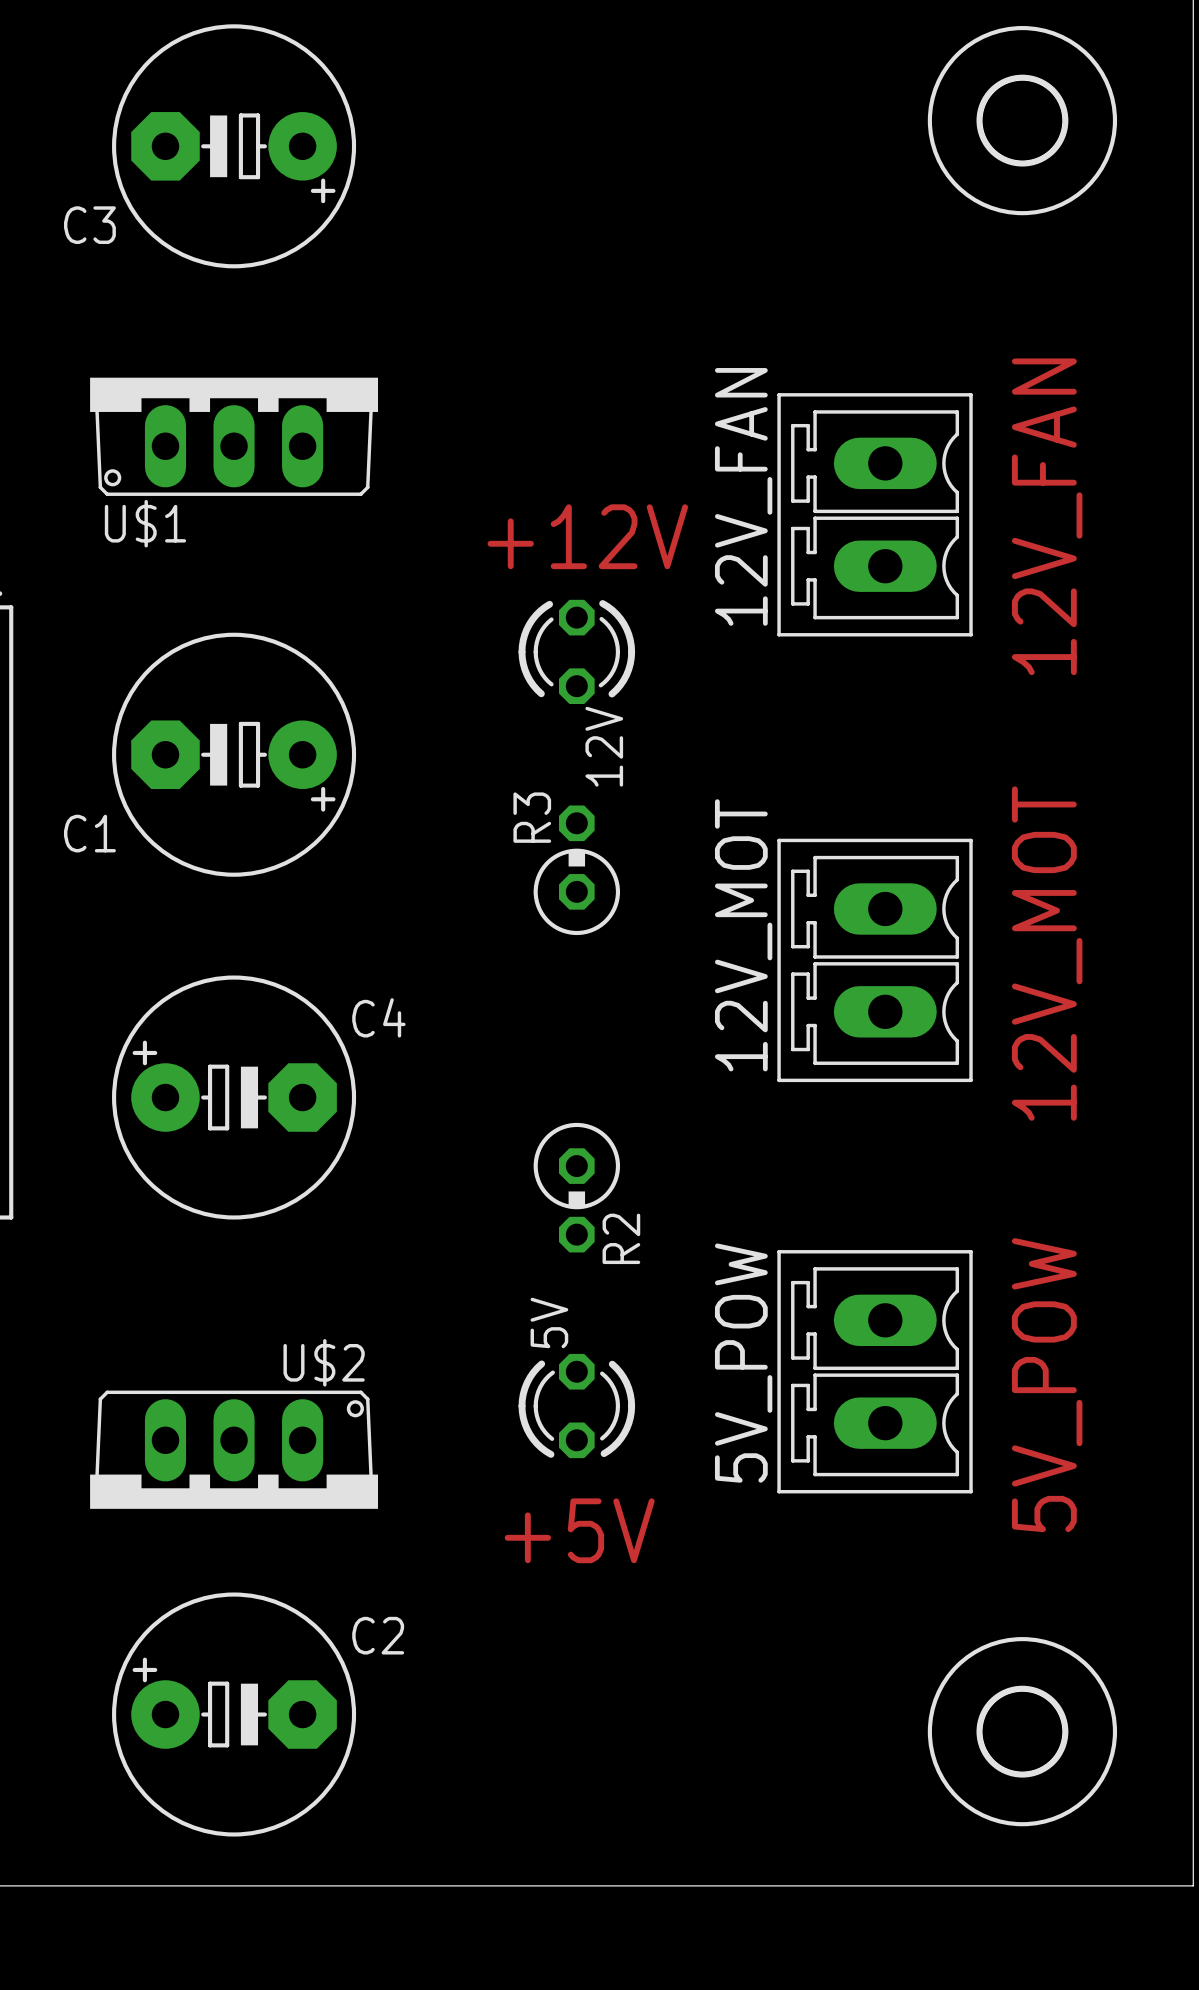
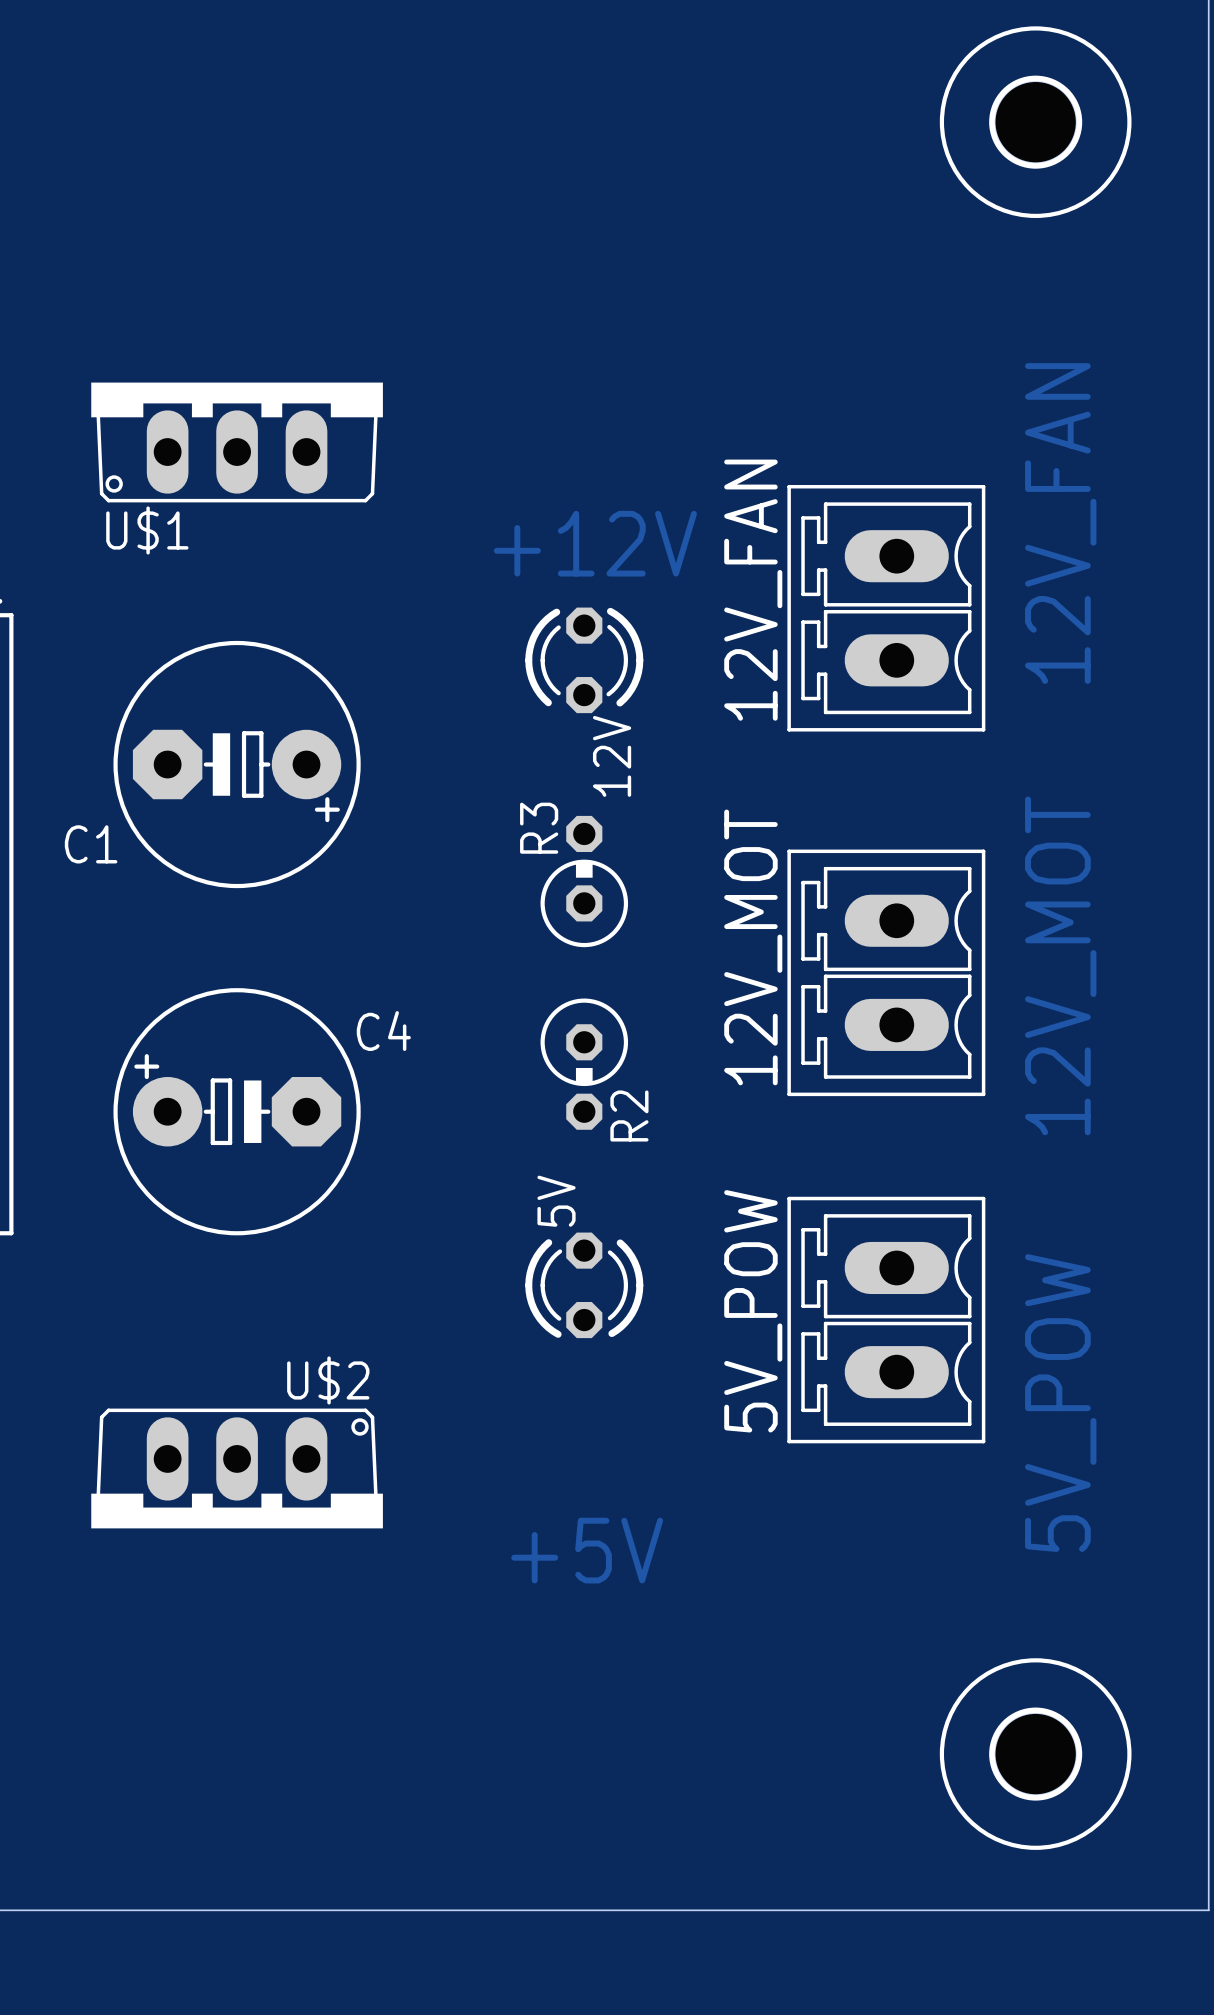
C3: (234, 146) -> none
12V_FAN position: (875, 514) -> (886, 608)
R2 position: (576, 1187) -> (584, 1064)
5V_POW position: (875, 1371) -> (886, 1320)
5V position: (576, 1406) -> (584, 1285)
C2: (234, 1714) -> none

